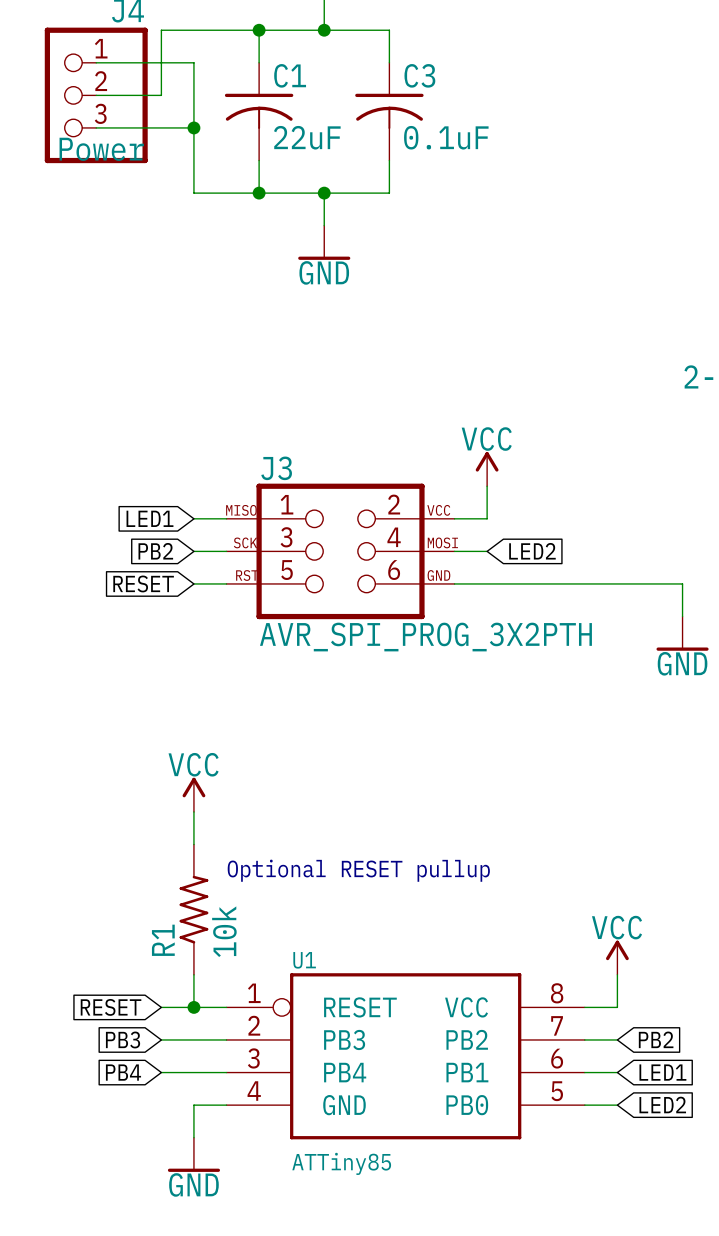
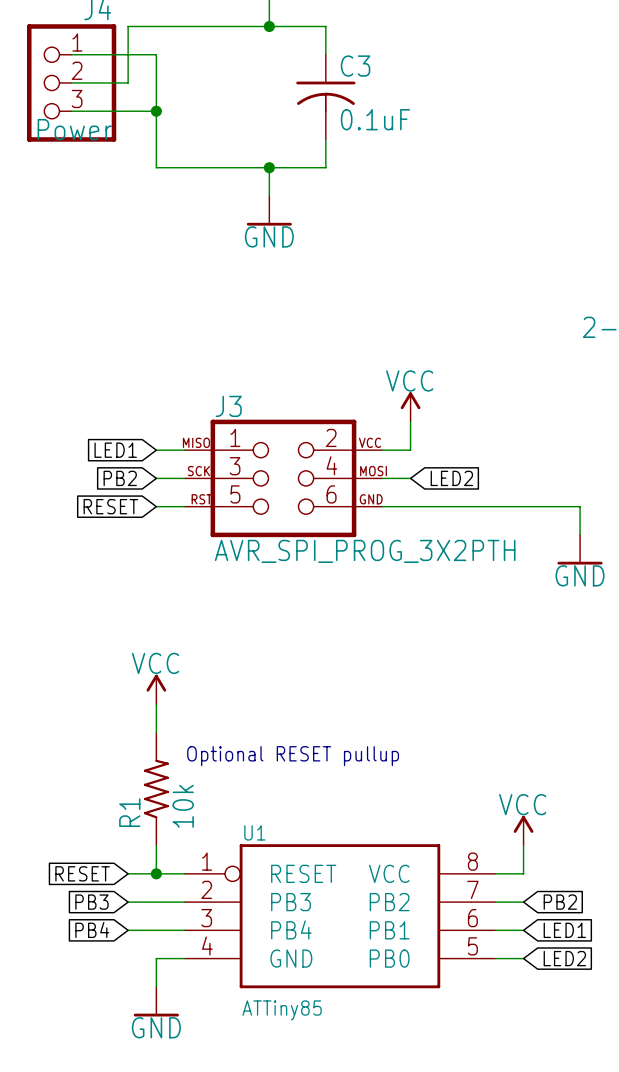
wire: (259, 30) (259, 62) -> none
junction: (259, 30) -> none
C1: 22uF (259, 111) -> none
wire: (259, 160) (259, 193) -> none
junction: (259, 193) -> none

